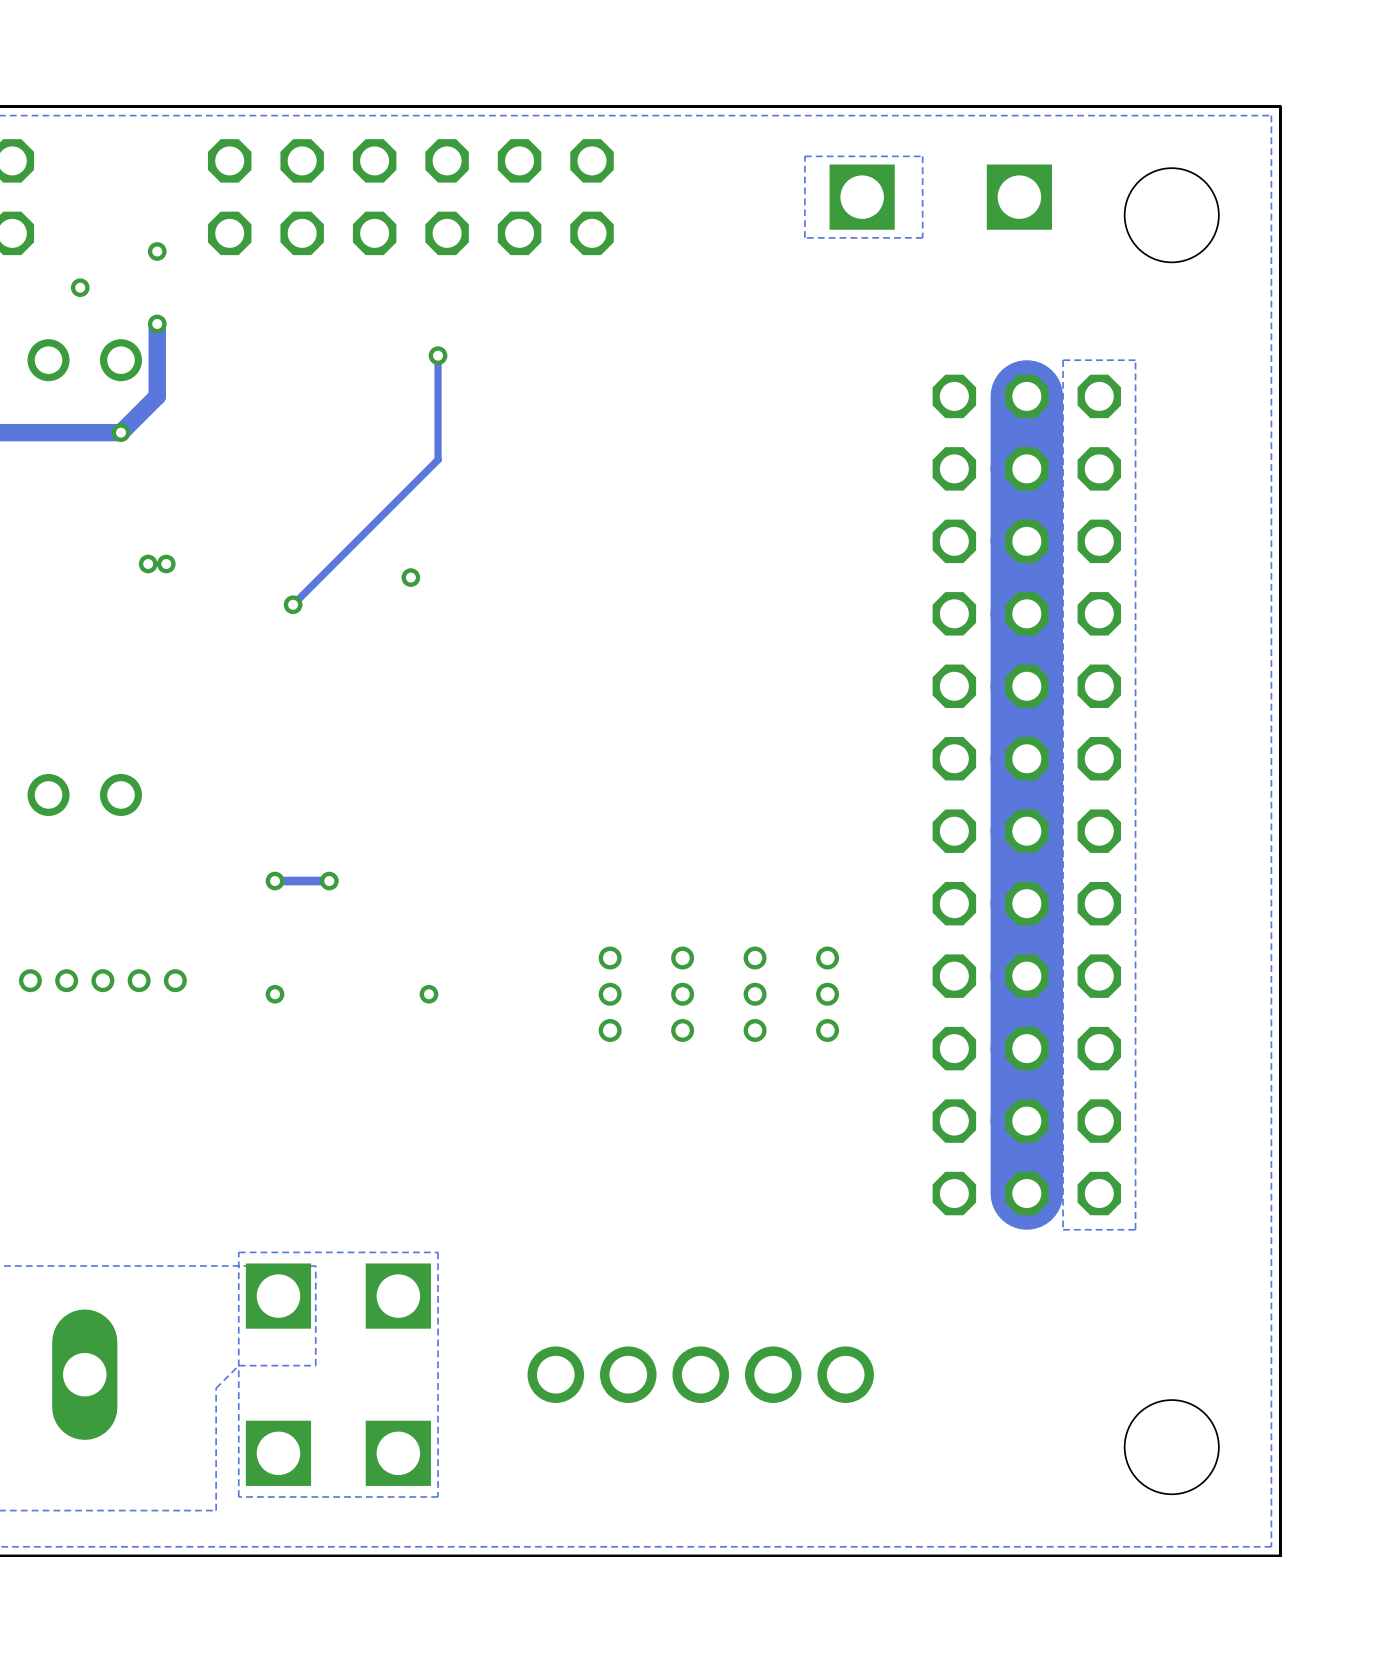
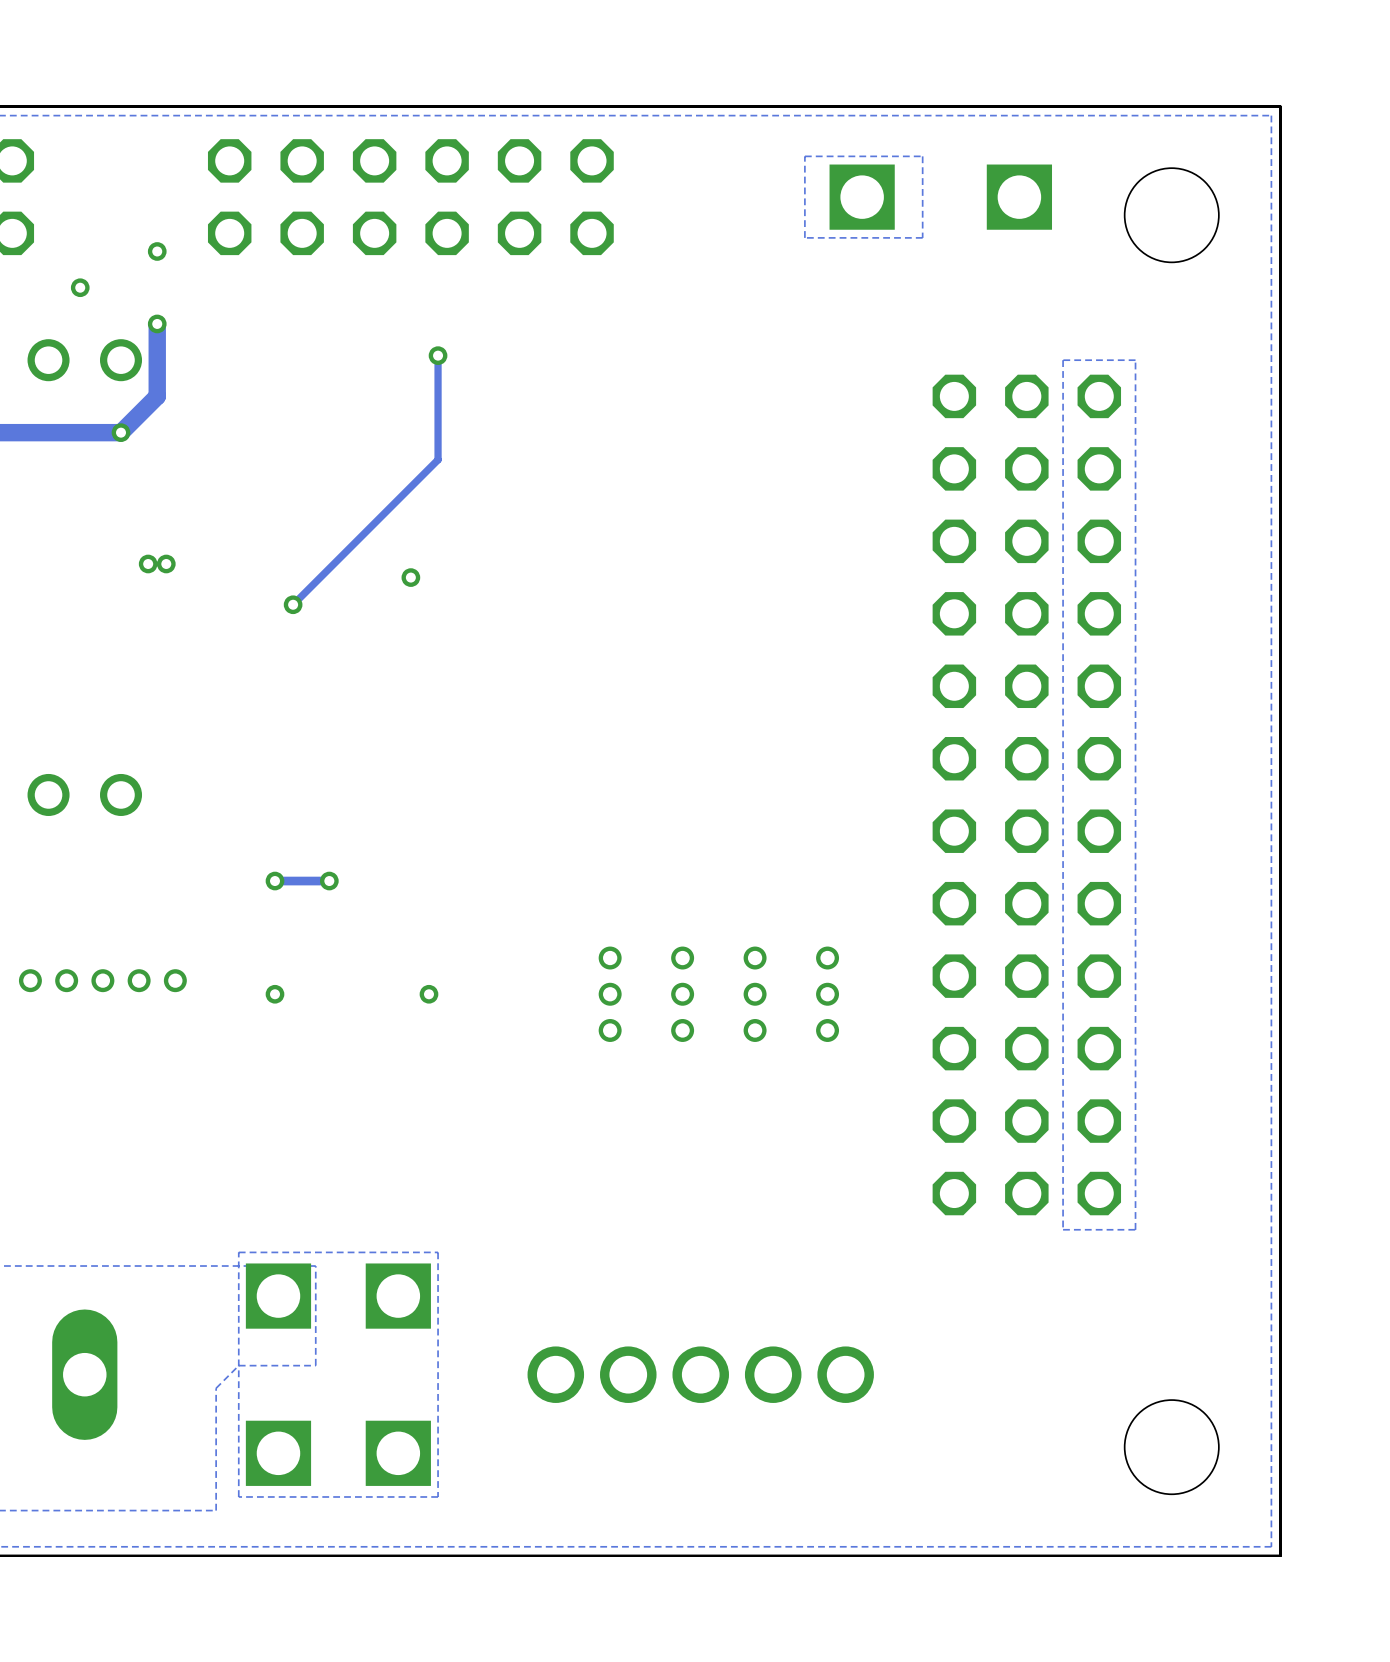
track: (1026, 396) (1026, 1193) -> none

